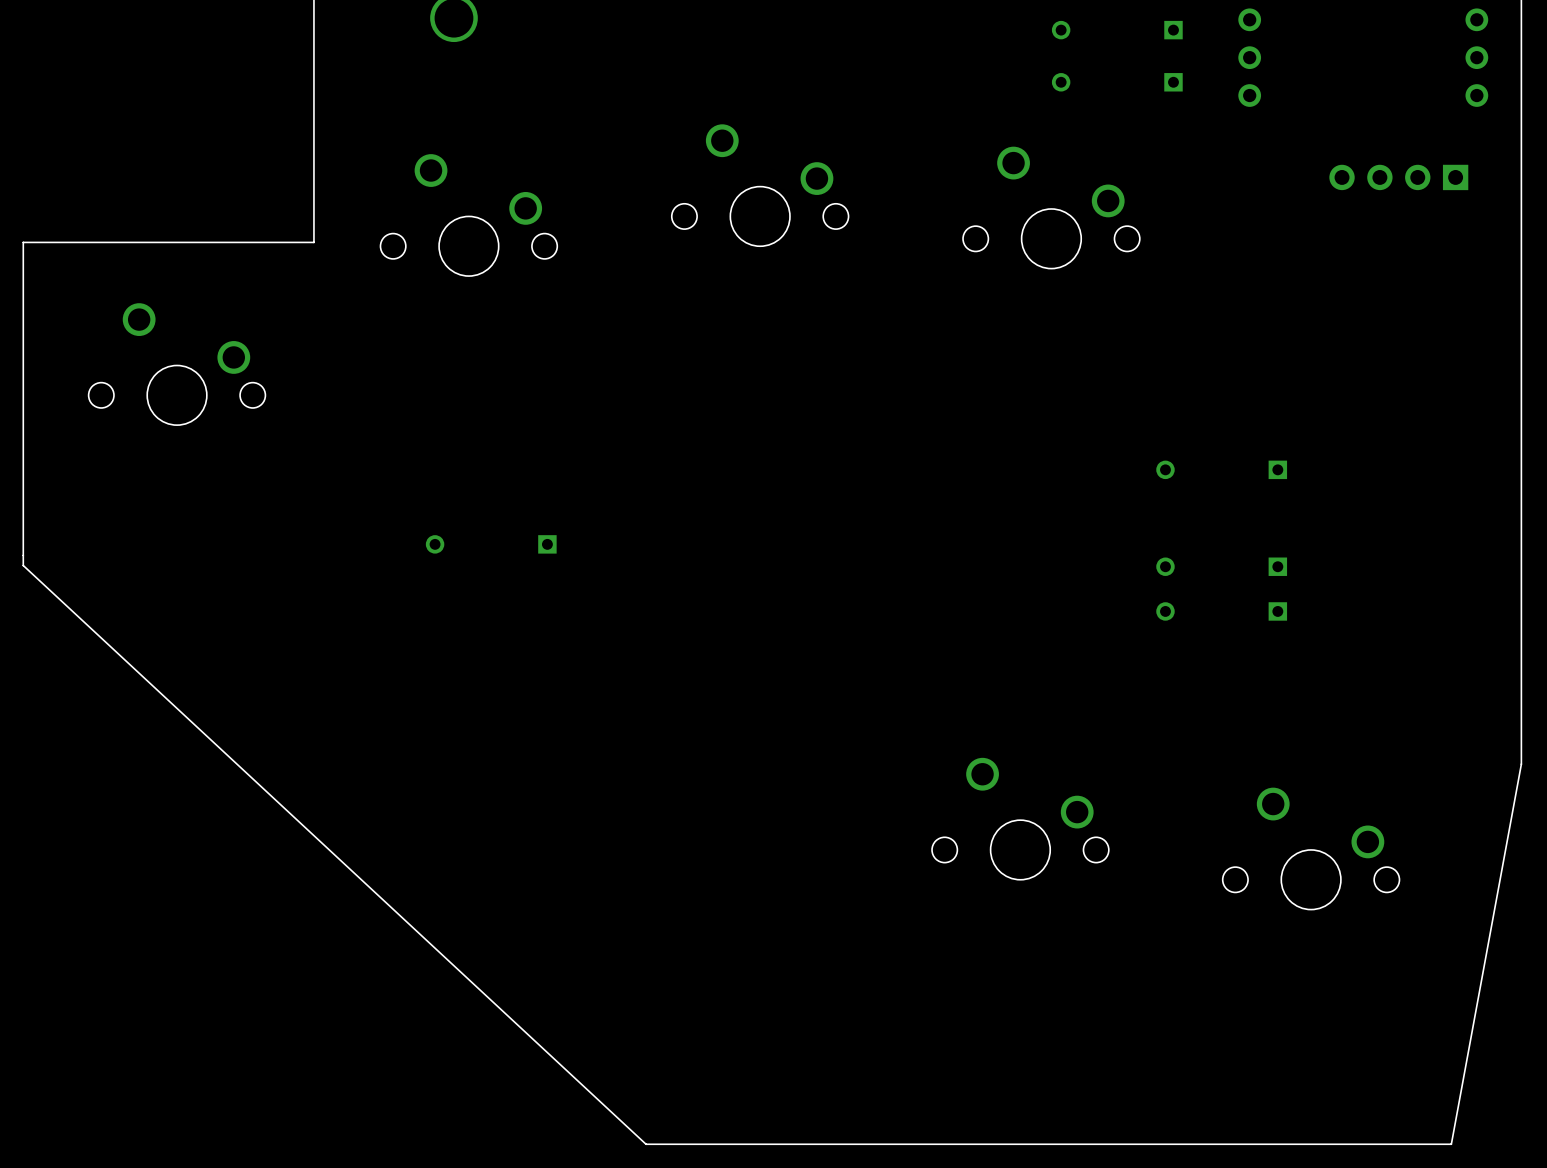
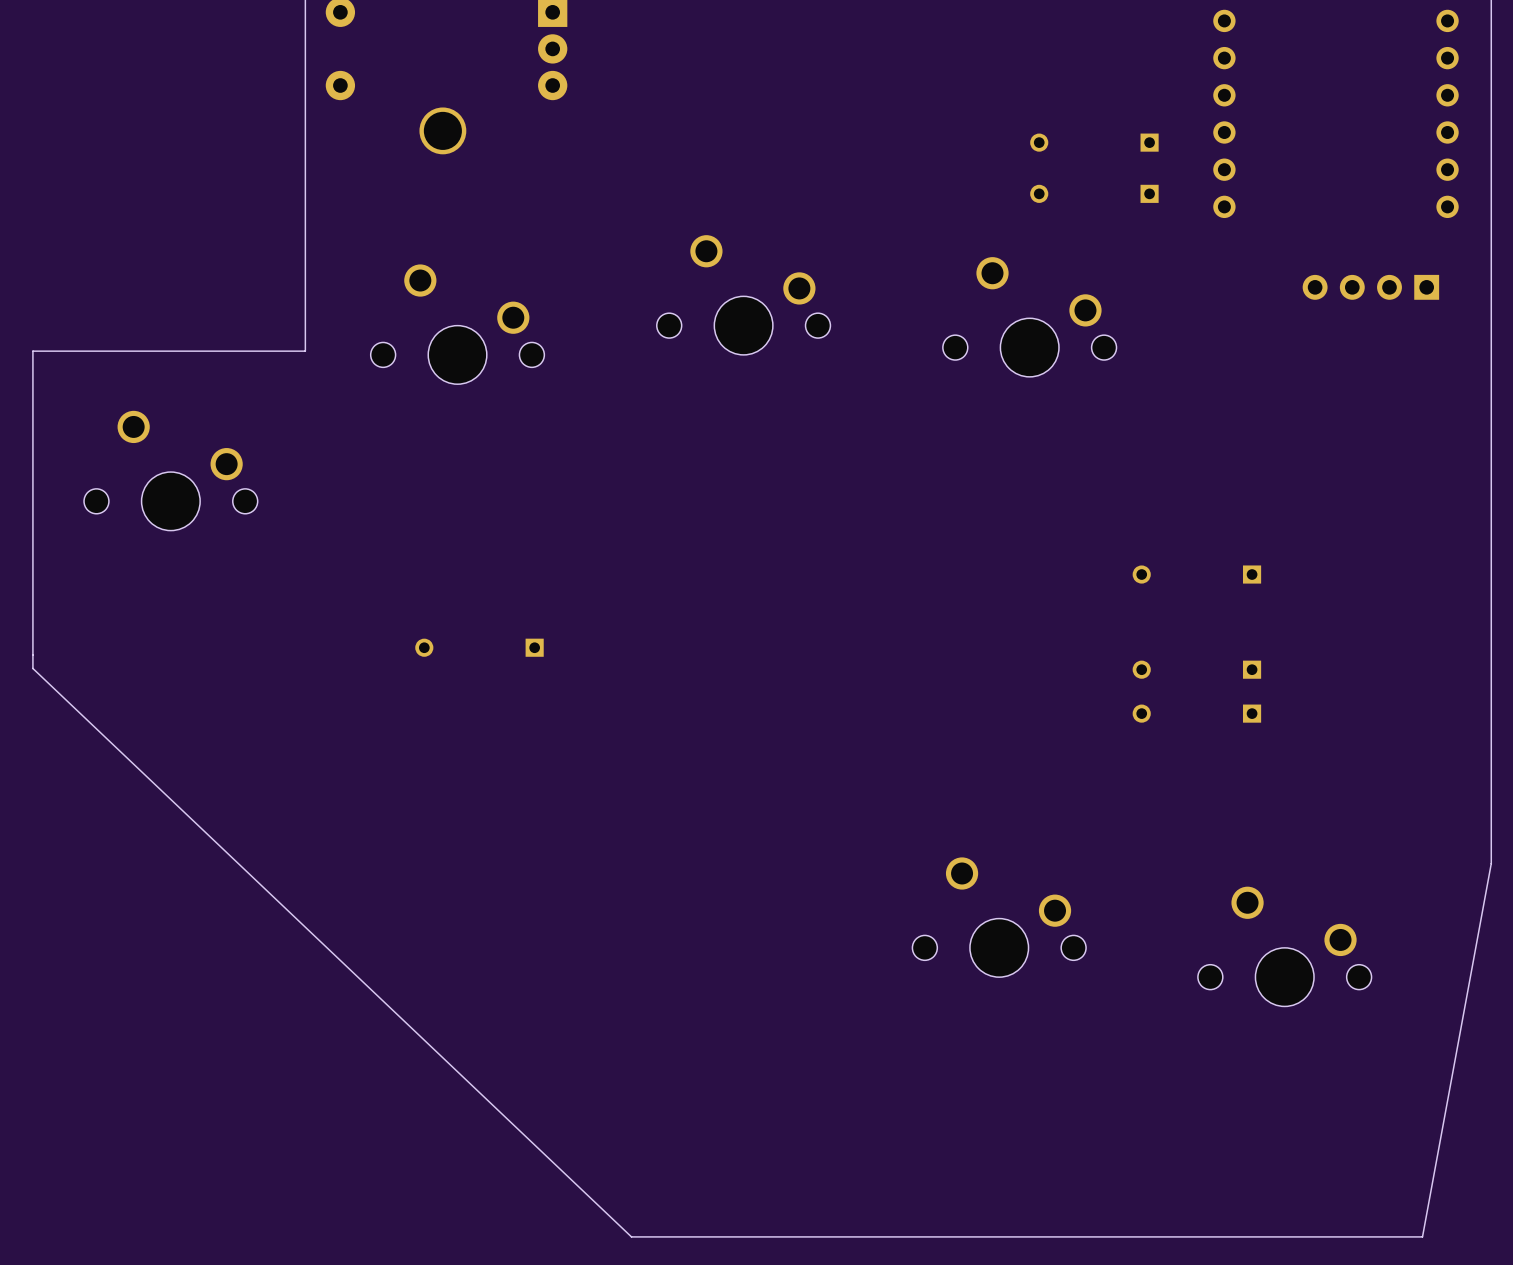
board edge: (36, 242) (23, 242) (23, 565) (646, 1144) -> (32, 351) (32, 668) (631, 1236)

